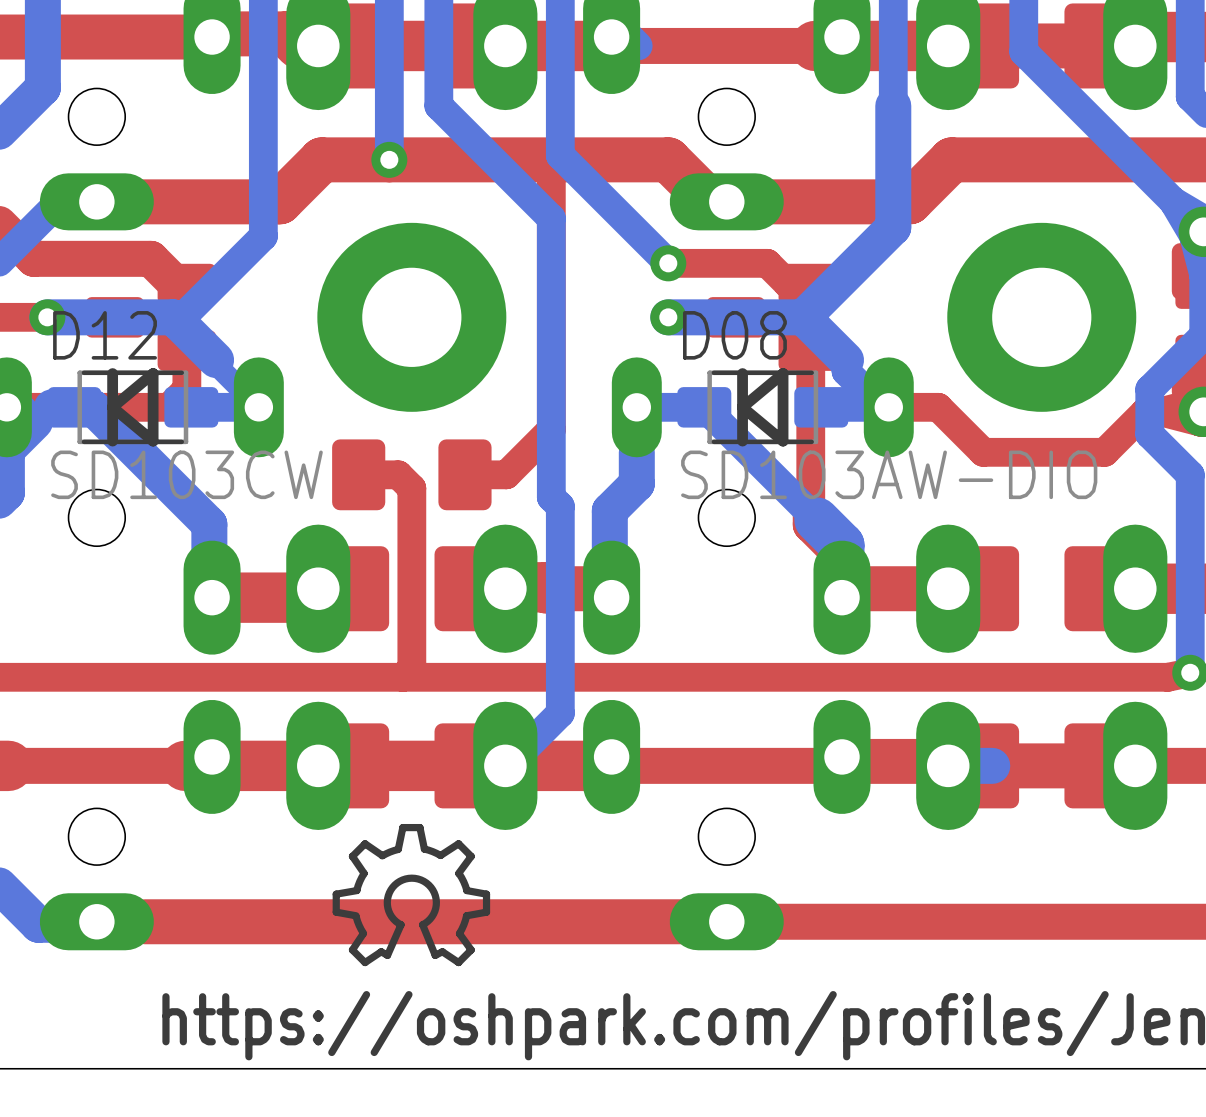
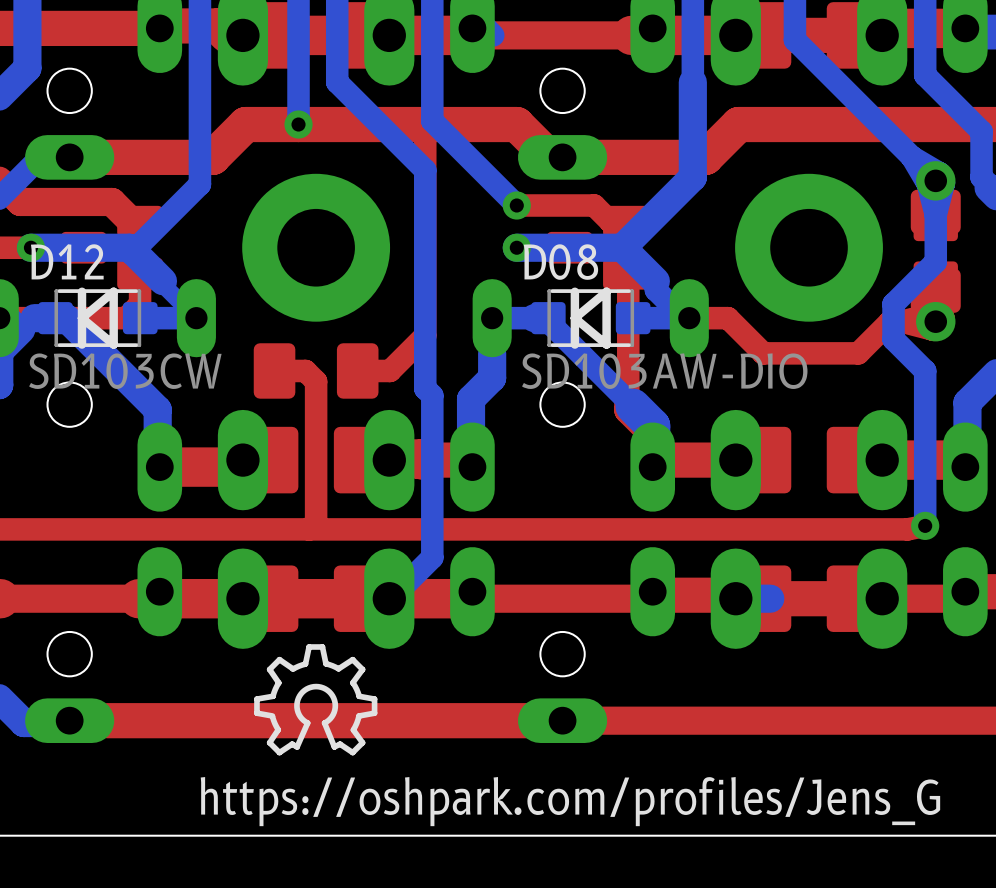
D12 footprint: [47, 368, 219, 447] -> [38, 287, 158, 349]
D08 footprint: [677, 368, 849, 447] -> [530, 287, 651, 349]

